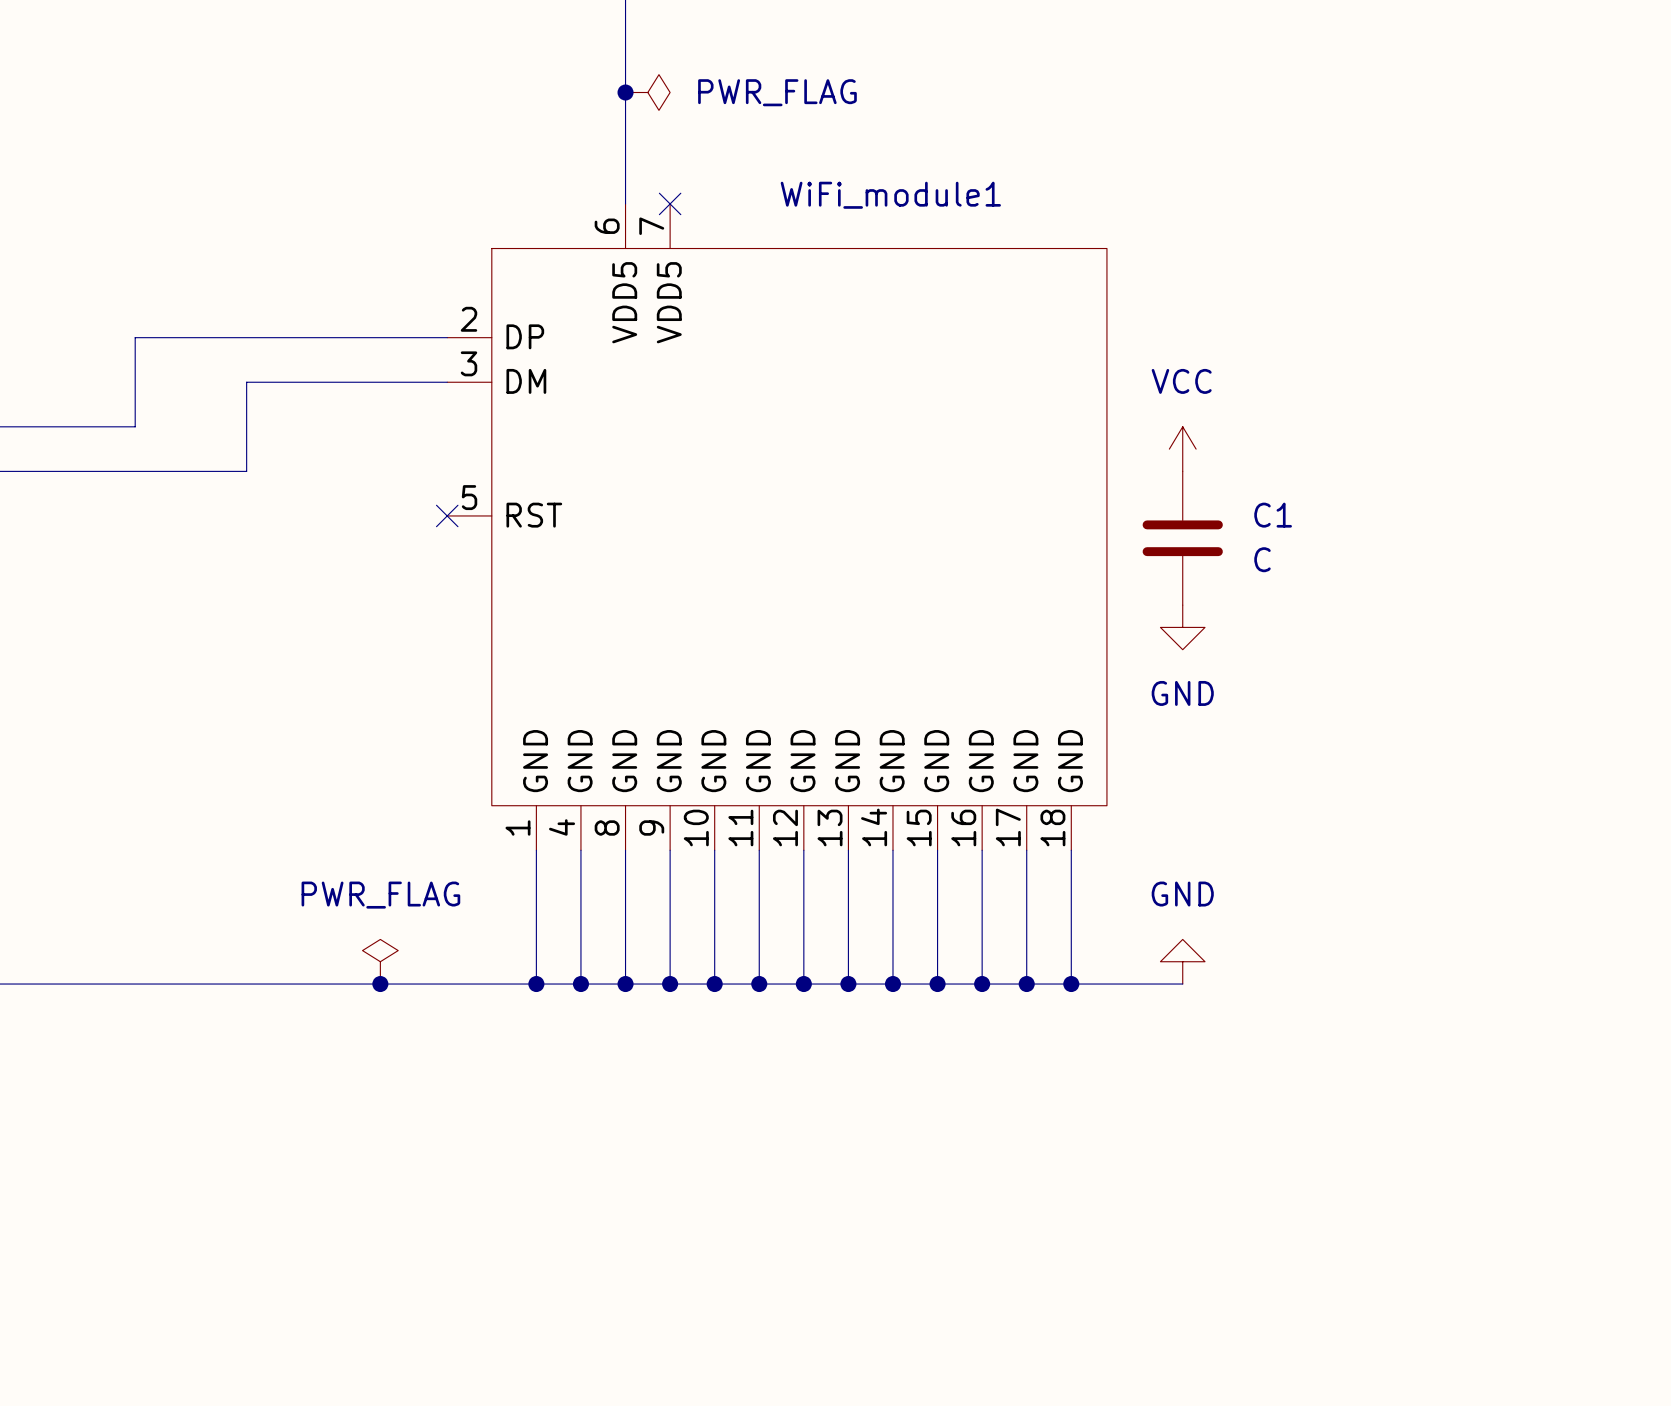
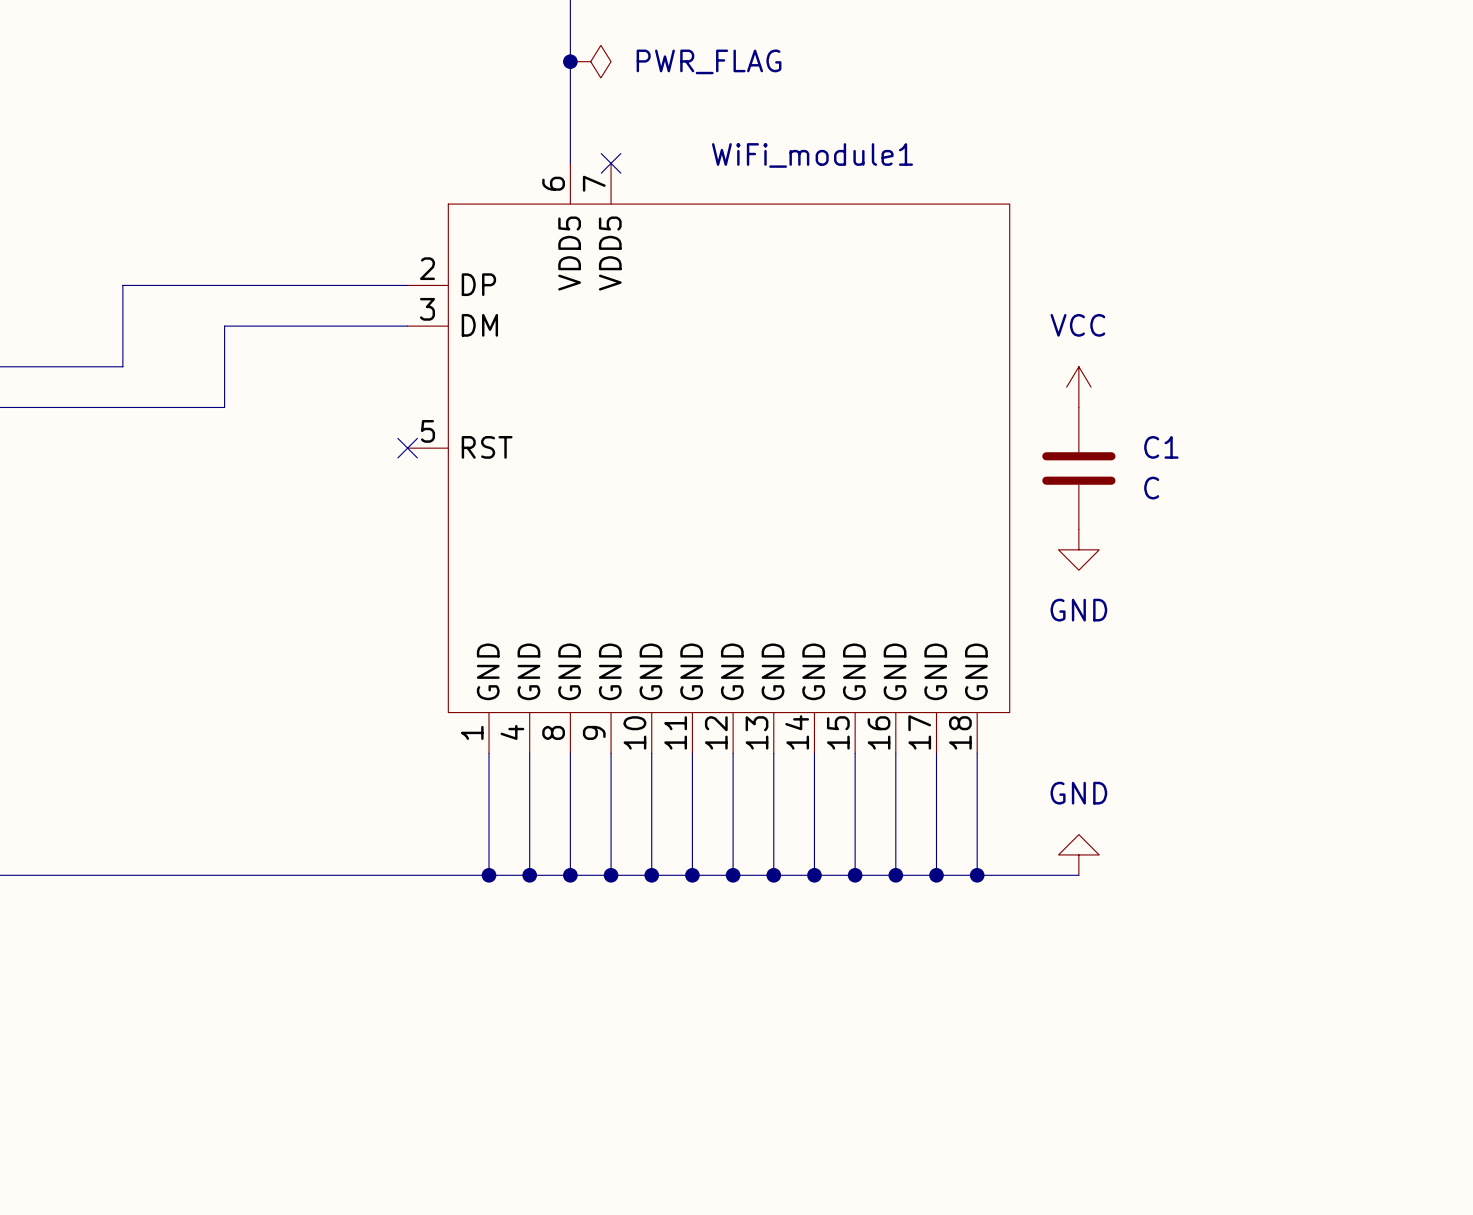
power symbol: PWR_FLAG (380, 961) -> none
junction: (380, 984) -> none

